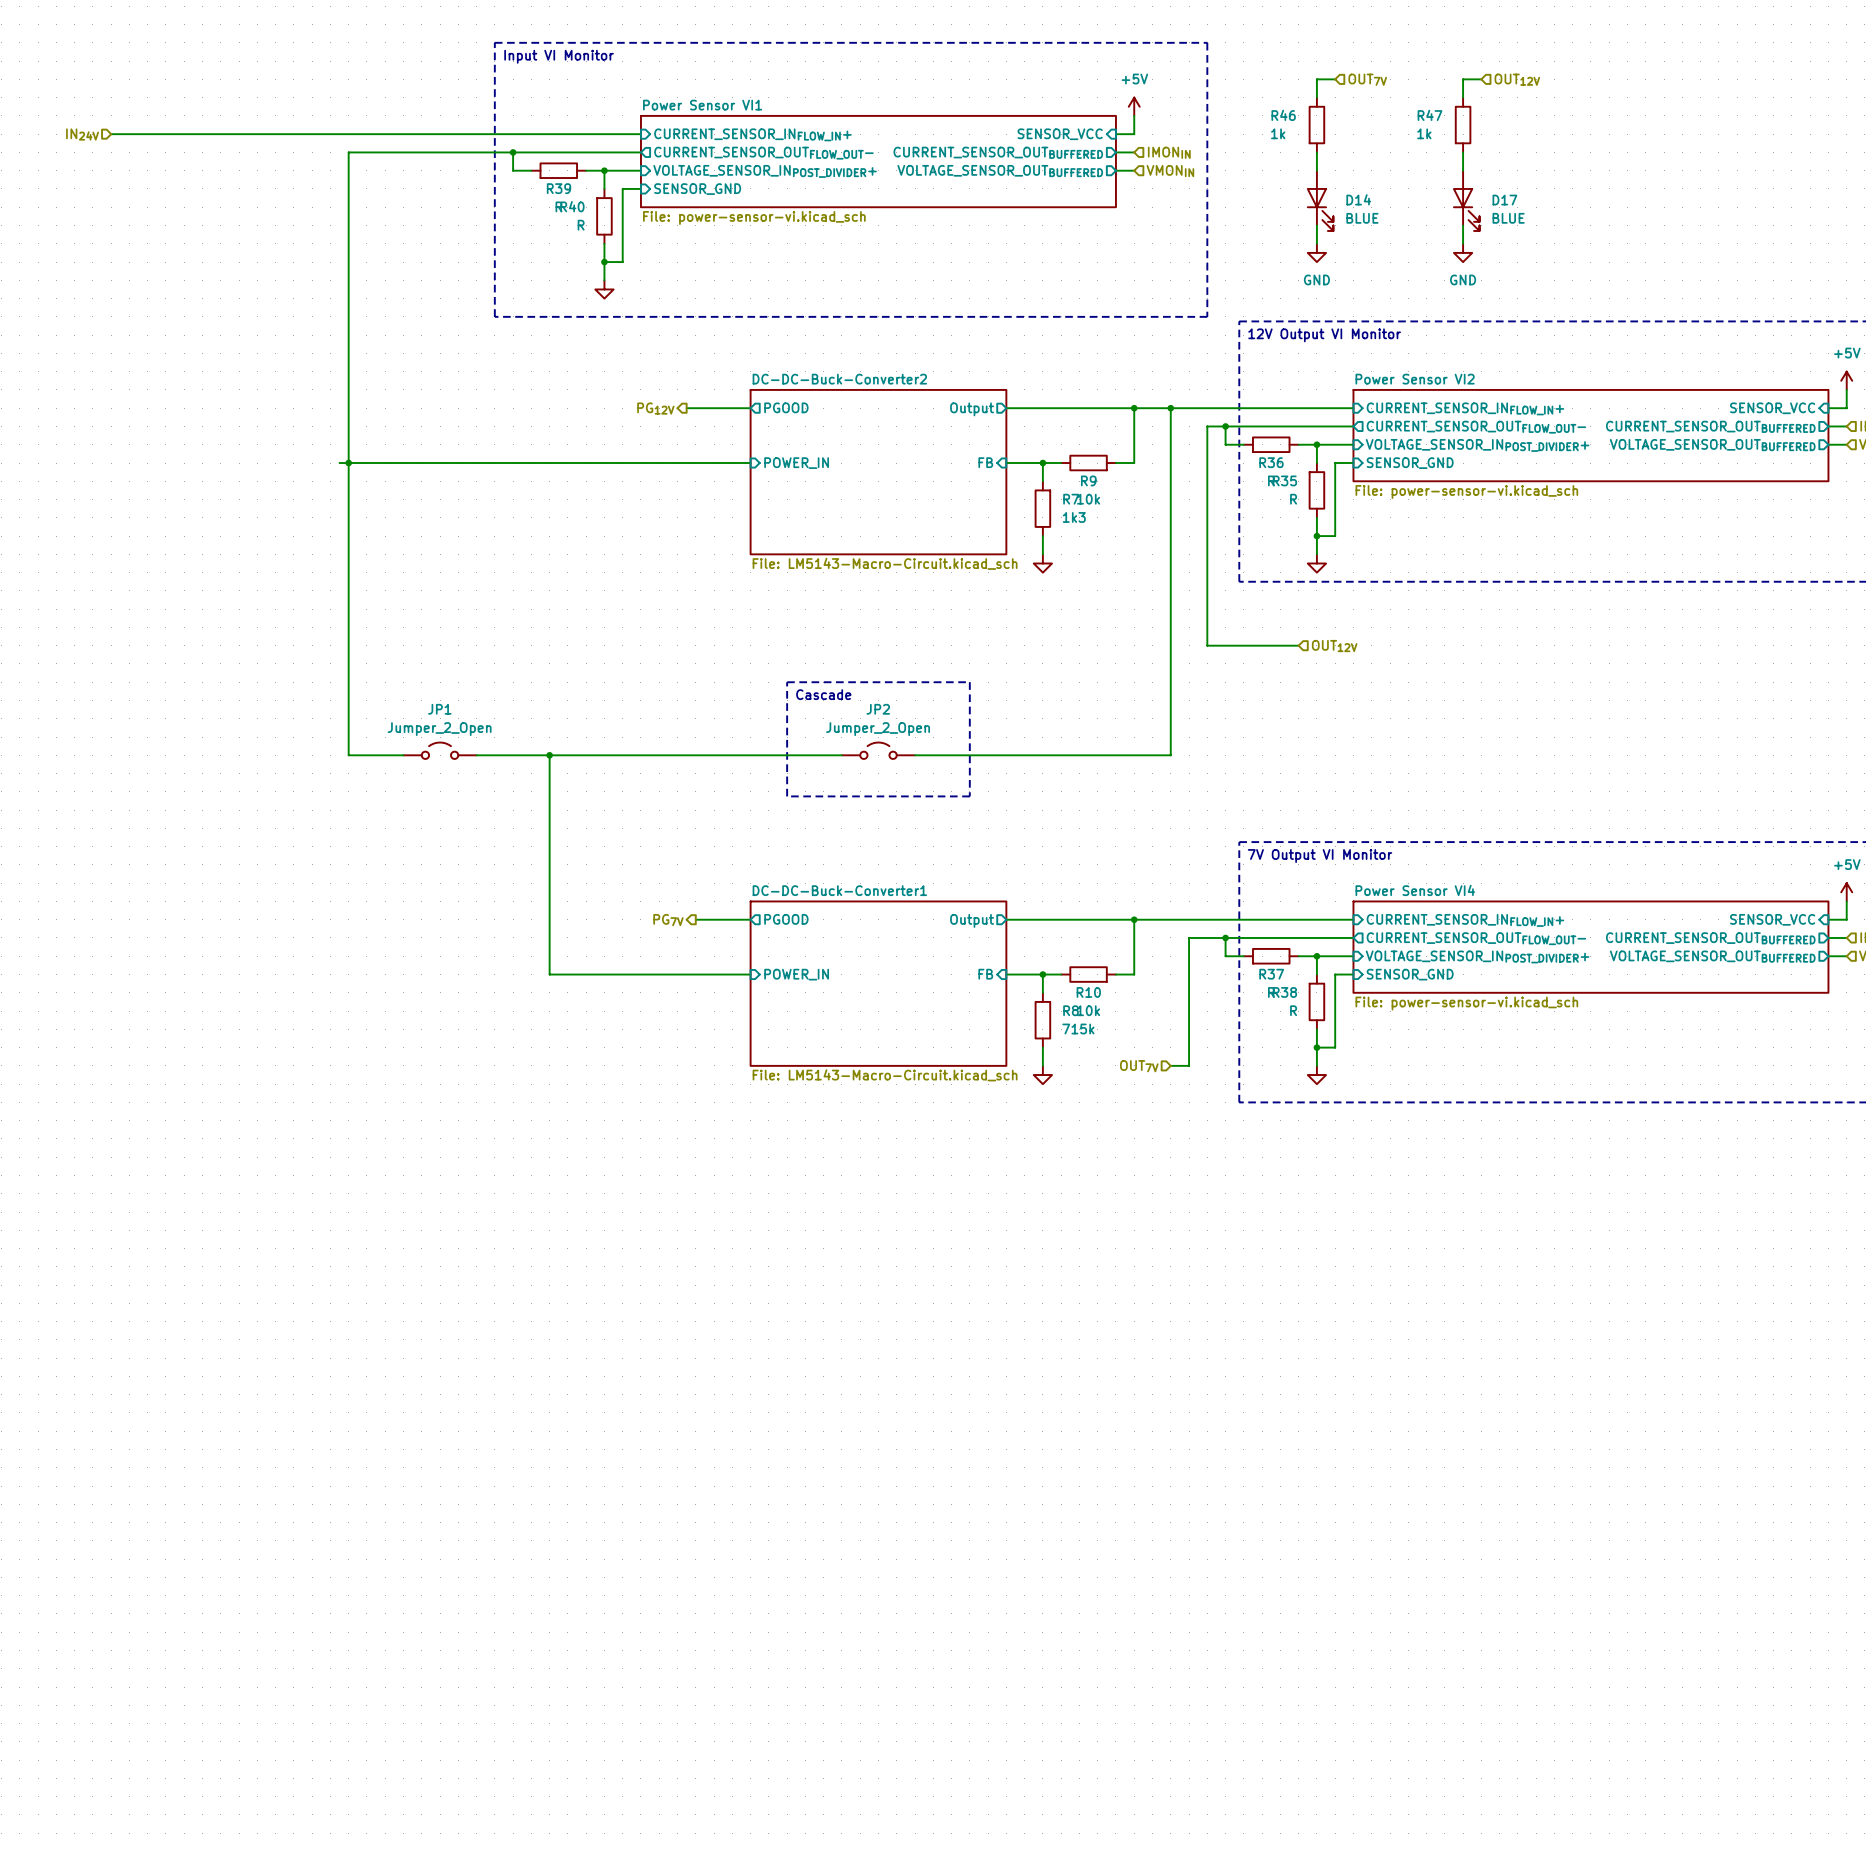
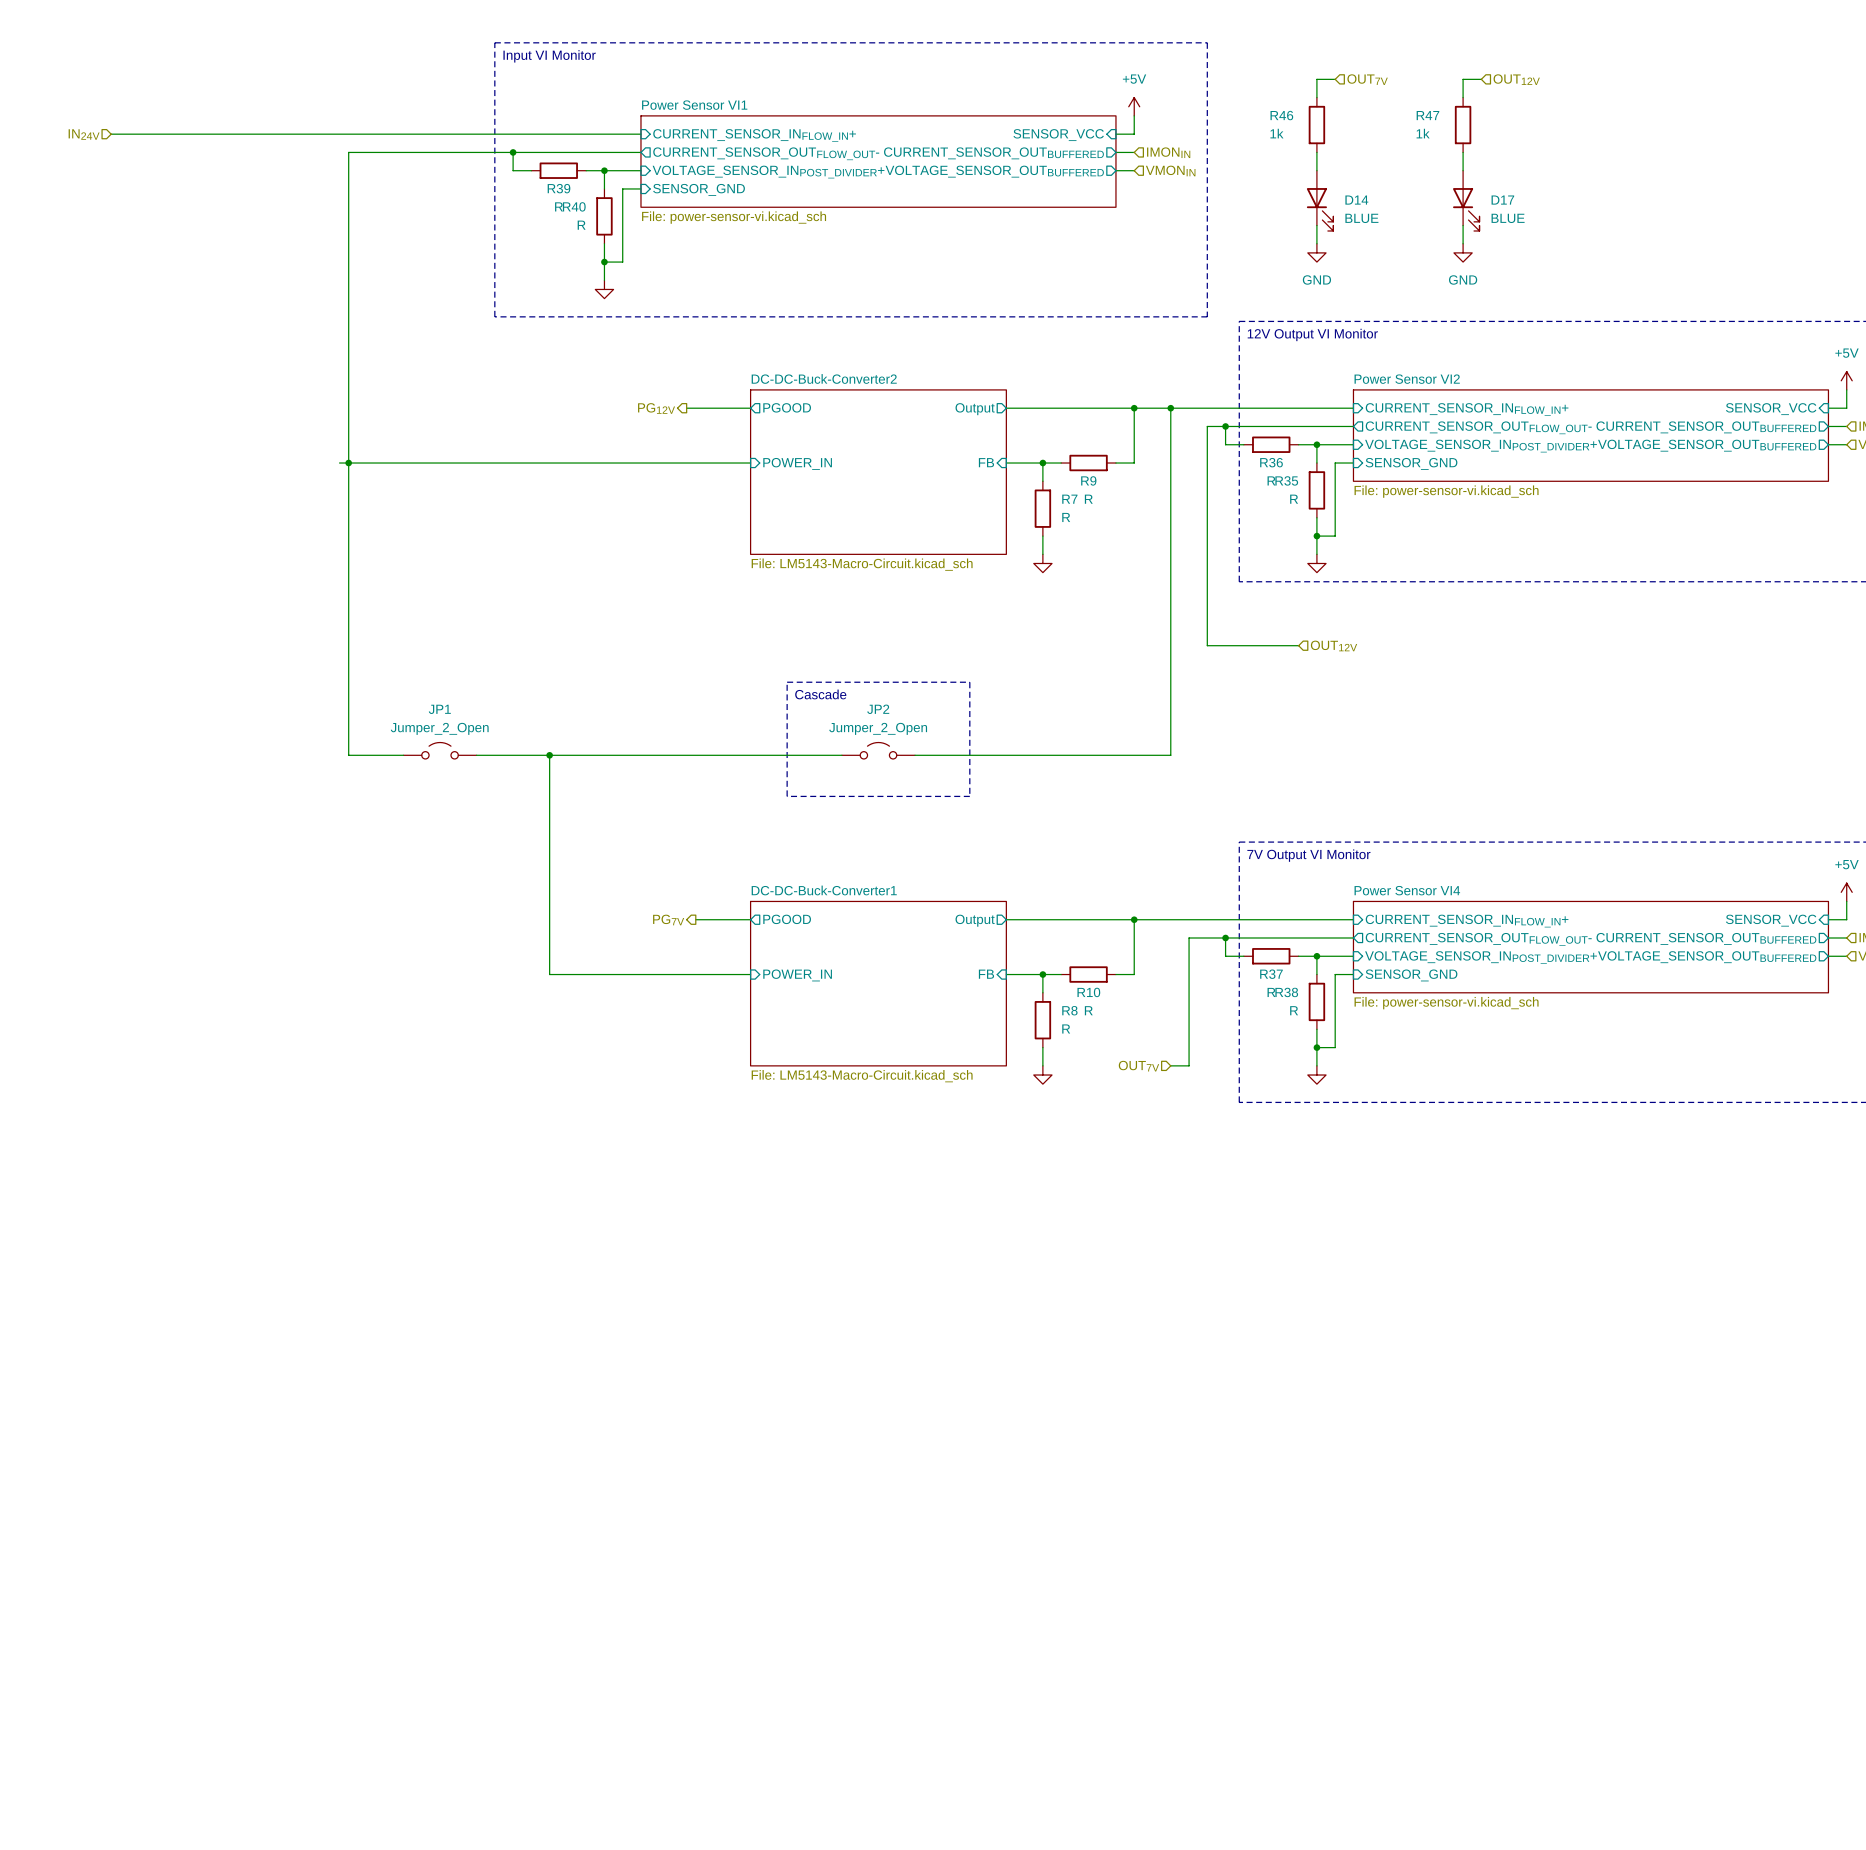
R9 value: 10k (1088, 499) -> R (1088, 499)
R7 value: 1k3 (1074, 517) -> R (1066, 517)
R10 value: 10k (1088, 1010) -> R (1088, 1010)
R8 value: 715k (1078, 1028) -> R (1066, 1028)

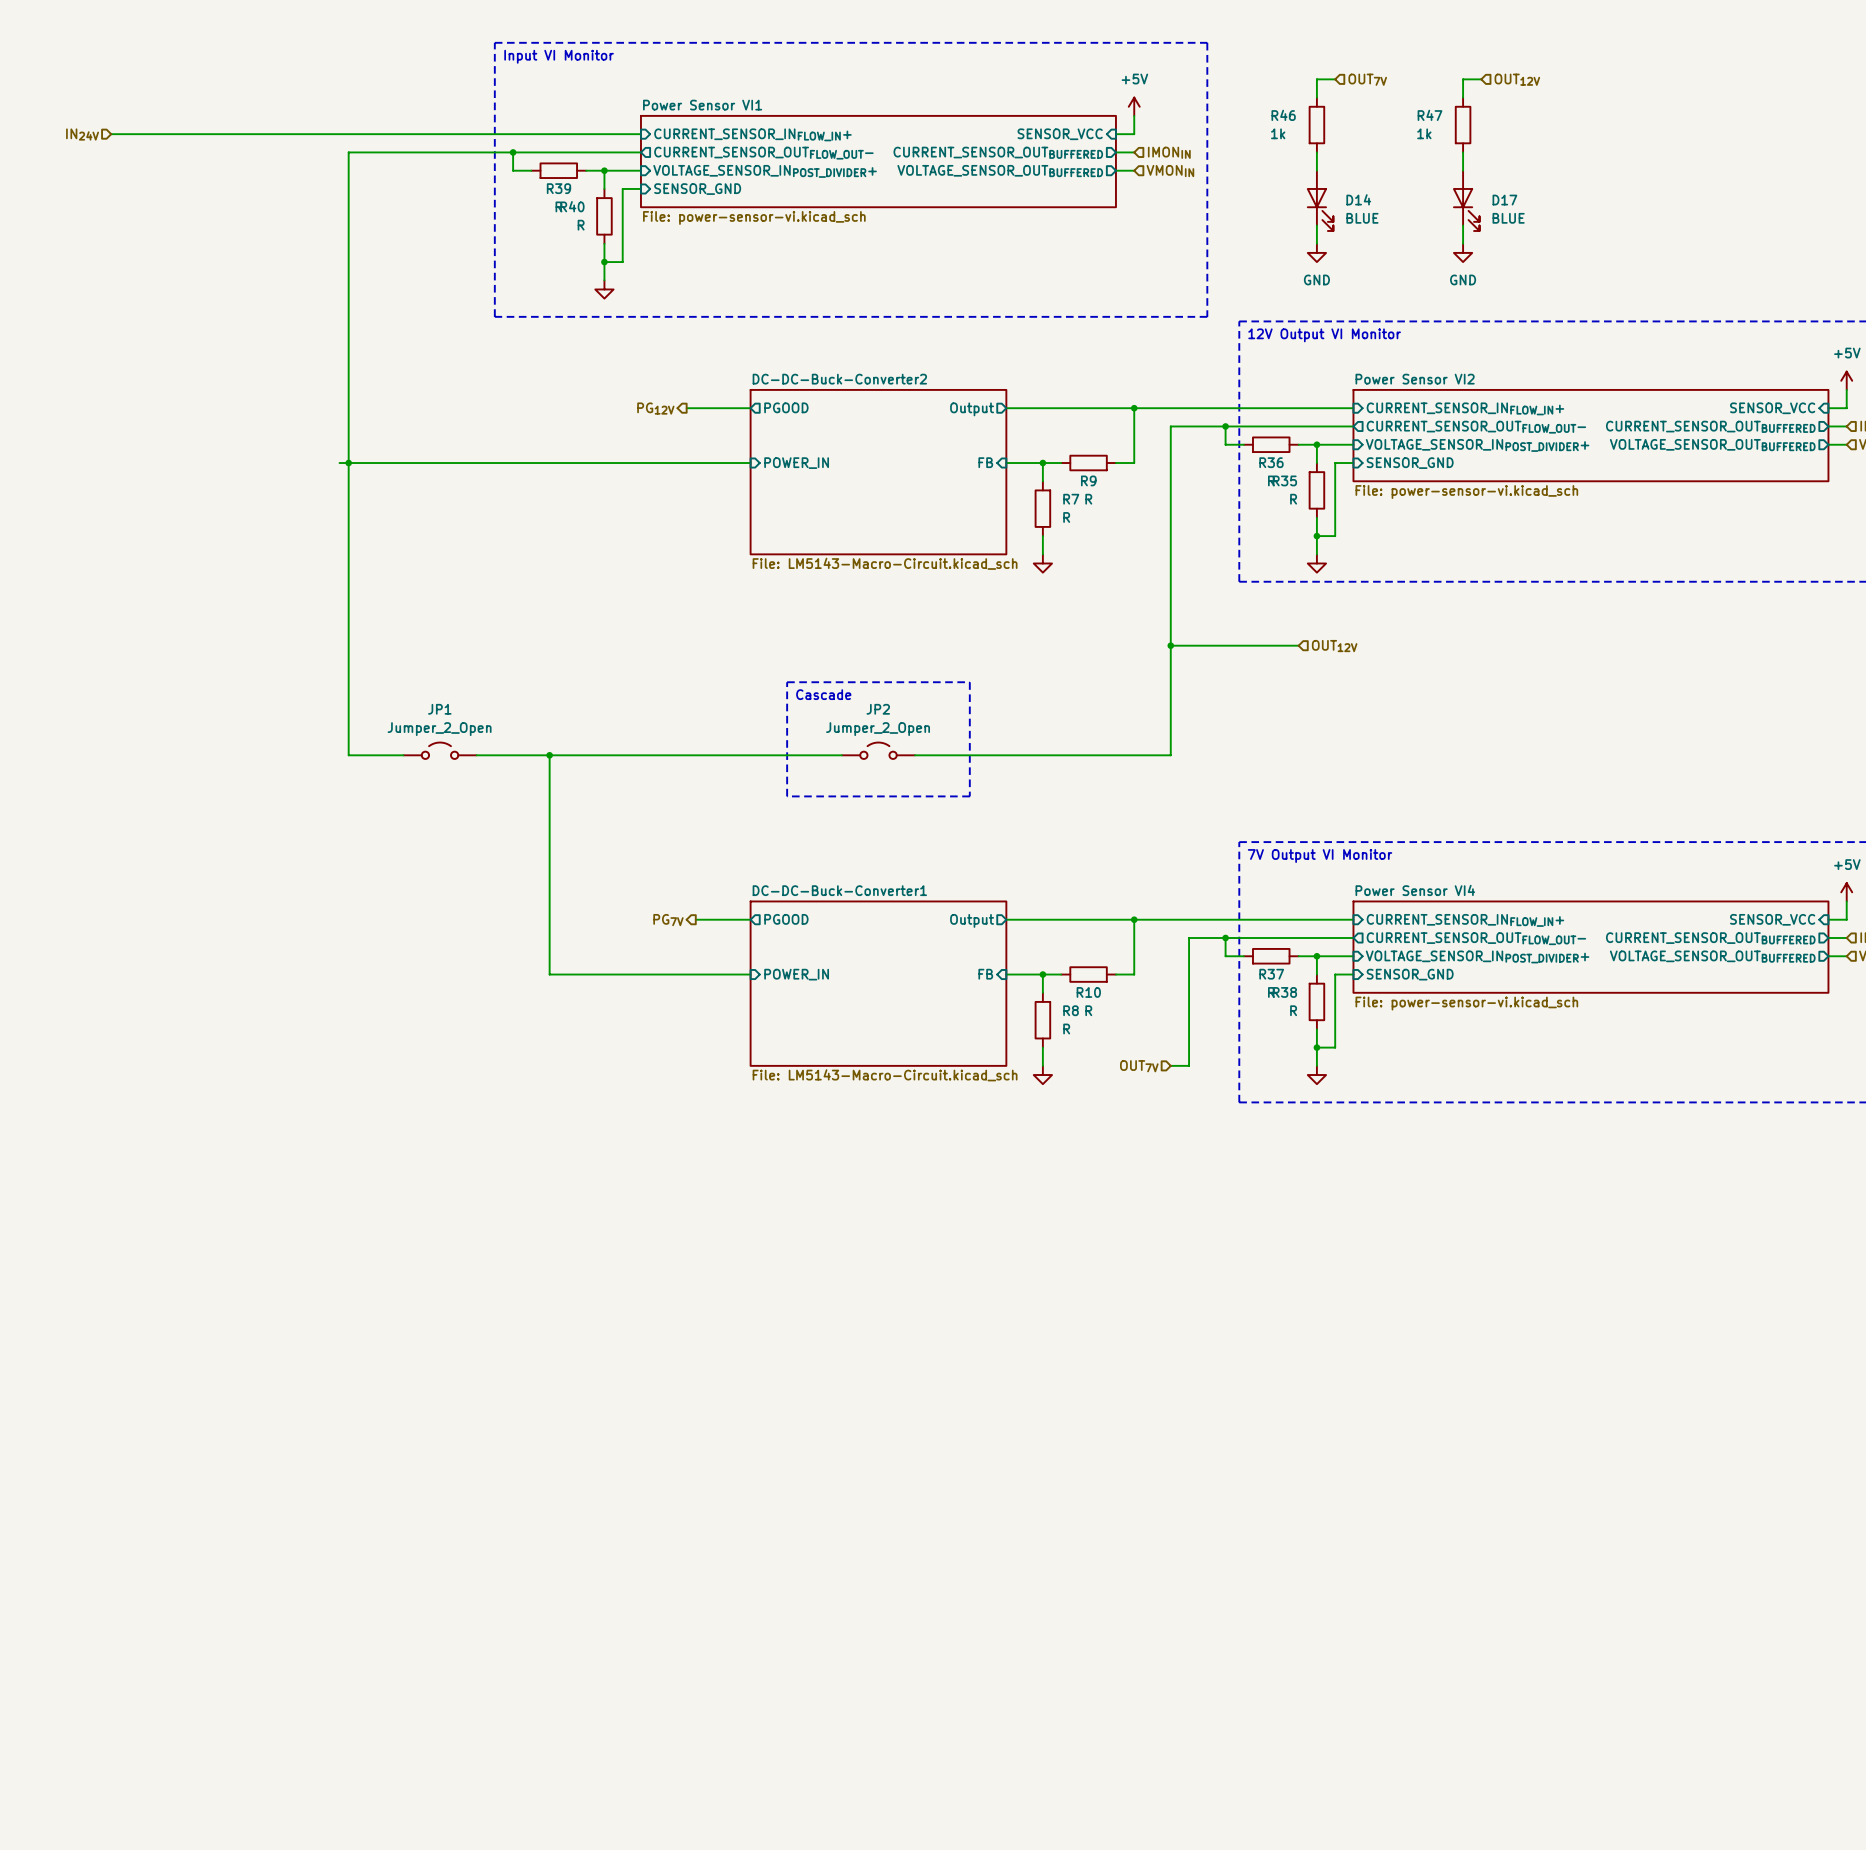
wire: (1170, 408) (1170, 426) -> (1207, 426) (1170, 426)
junction: (1170, 408) -> none
wire: (1207, 426) (1207, 645) -> (1170, 645) (1207, 645)
junction: none -> (1170, 645)

